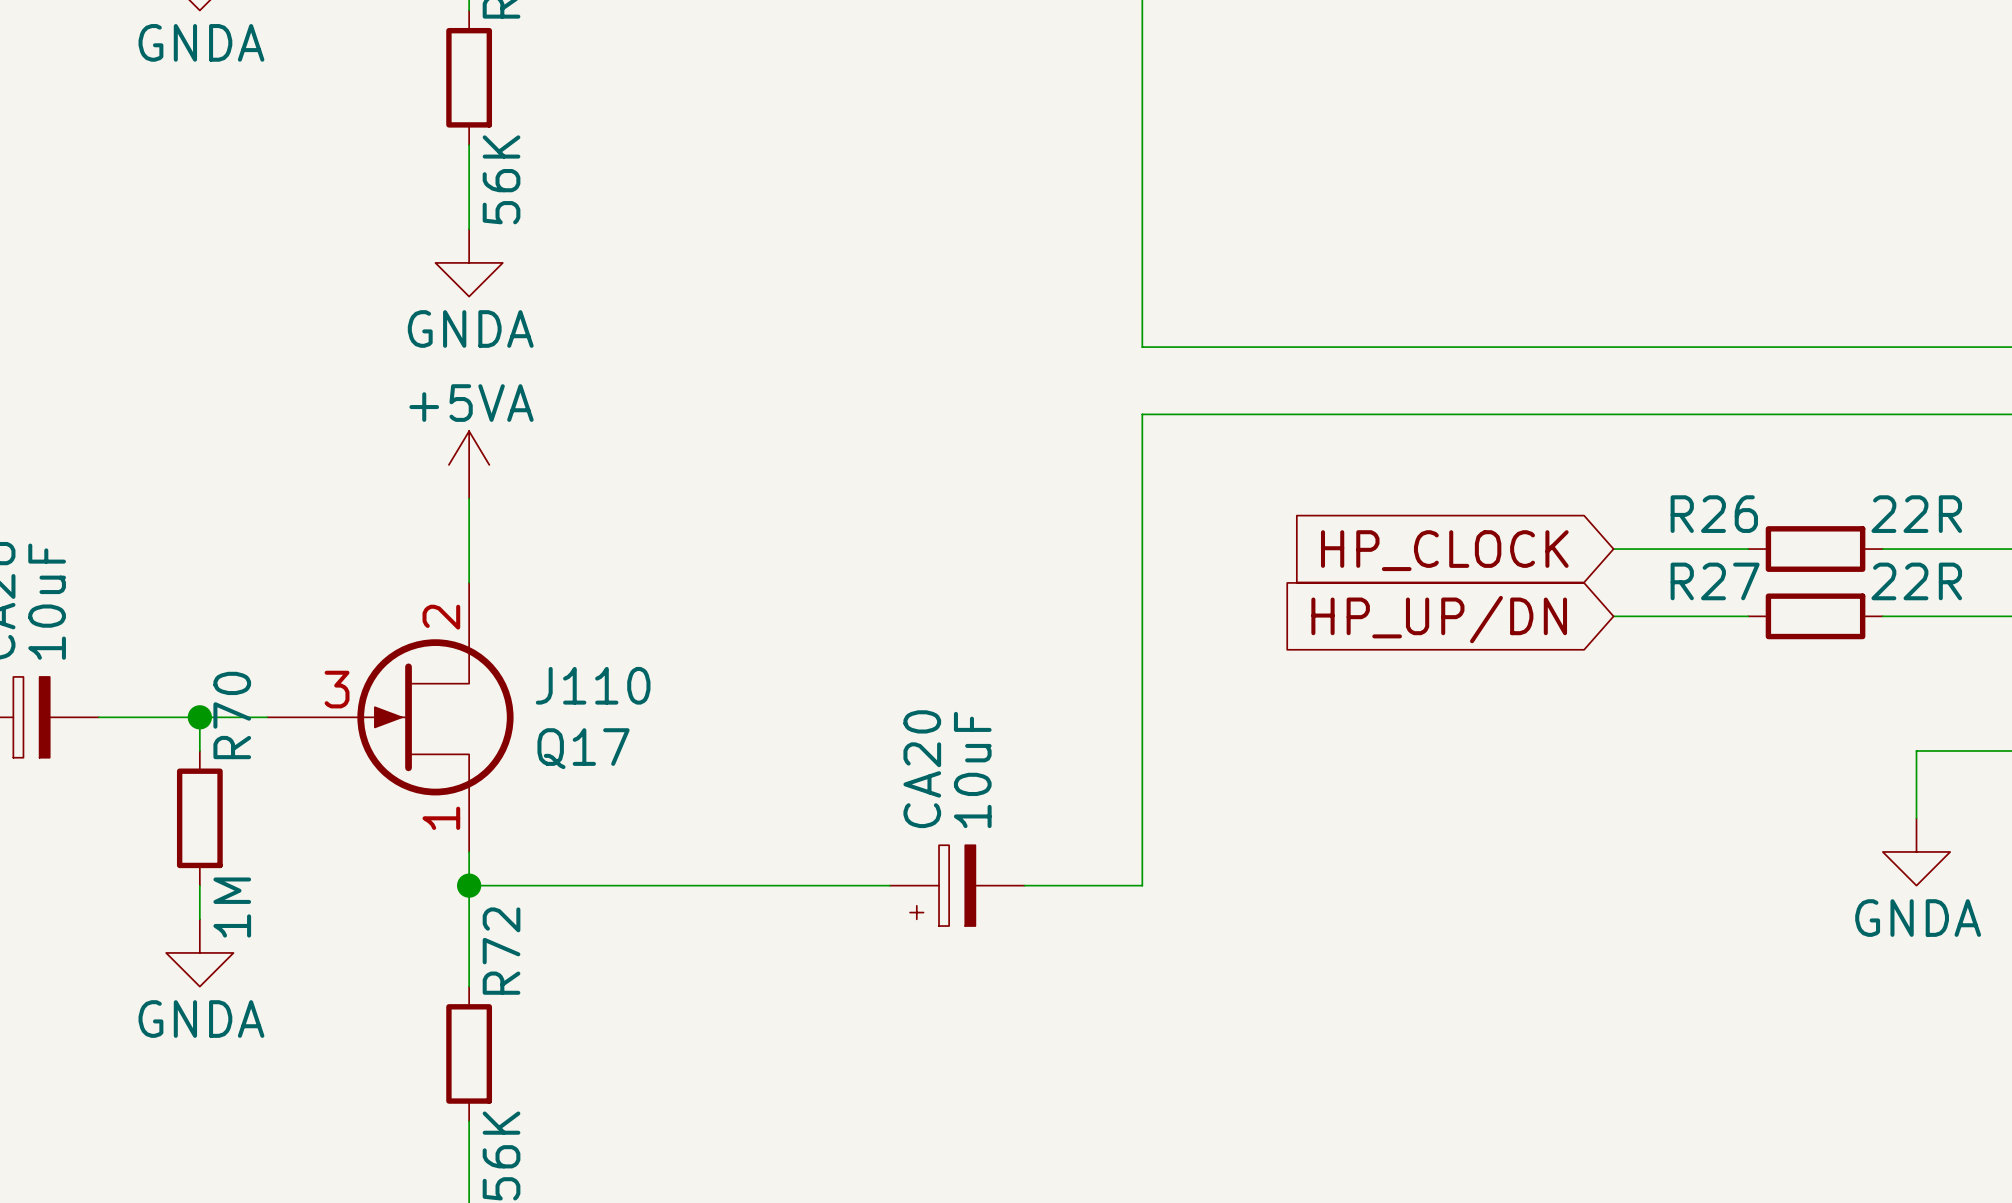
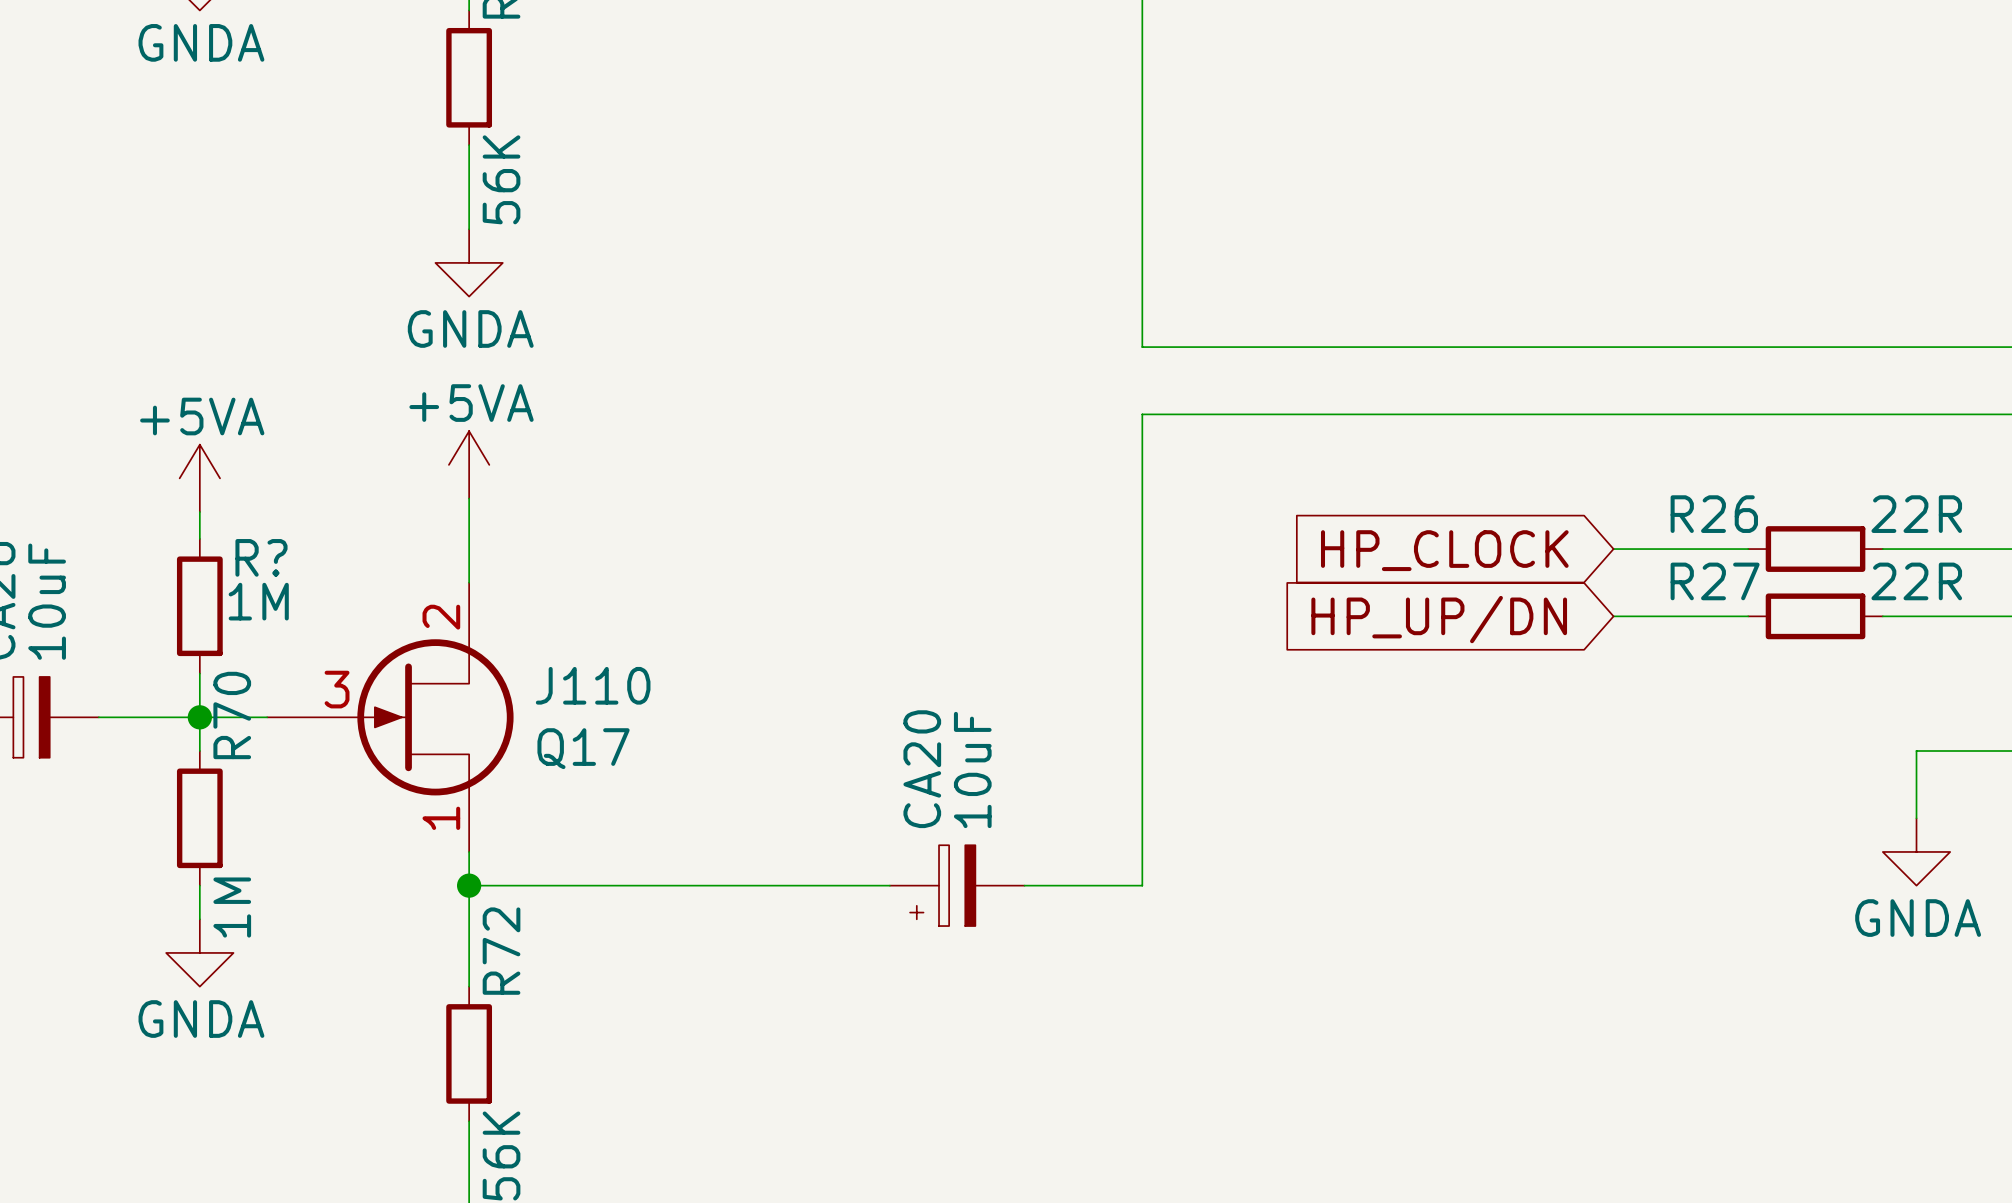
power symbol: none -> +5VA (199, 478)
wire: none -> (199, 512) (199, 538)
R?: none -> 1M (199, 606)
wire: none -> (199, 673) (199, 717)

